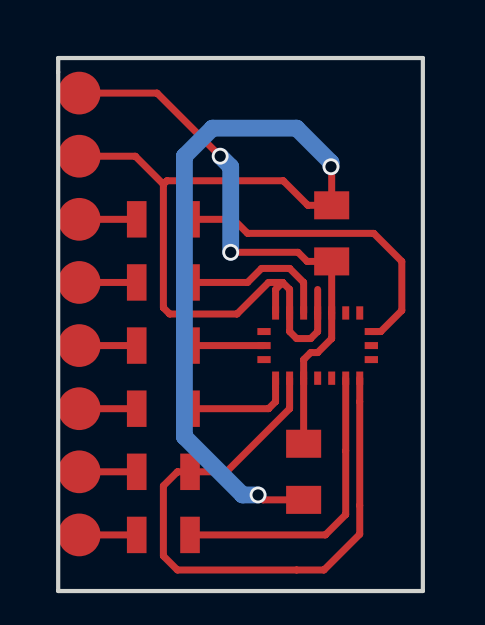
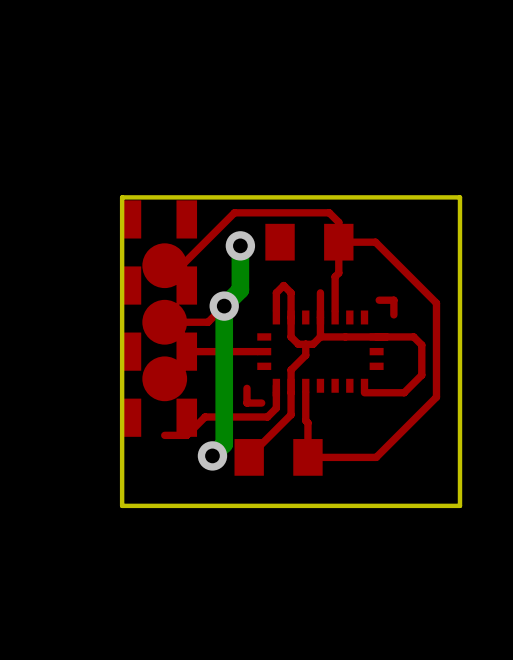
board edge: (422, 58) (58, 58) (58, 591) (422, 591) (422, 58) -> none
top track: (79, 93) (157, 93) (220, 156) -> none
part: (79, 93) -> none
top track: (79, 156) (135, 156) (163, 184) -> none
part: (79, 156) -> none
bottom track: (220, 156) (230, 166) (230, 252) -> none
via: (220, 156) -> none
bottom track: (330, 166) (330, 162) (296, 128) (212, 128) (184, 156) (184, 436) (242, 494) (258, 494) -> none
top track: (330, 166) (331, 205) (307, 205) (283, 180) (166, 180) (163, 184) -> none
via: (330, 166) -> none
top track: (163, 184) (163, 307) (169, 314) (237, 314) (268, 282) (282, 282) -> none
board edge: none -> (459, 197) (459, 505) (122, 505) (122, 197) (459, 197)
part: (79, 219) -> none
top track: (136, 219) (79, 219) -> none
top track: (190, 219) (233, 219) (247, 233) (373, 233) (401, 261) (401, 310) (380, 331) -> (364, 392) (404, 392) (421, 375) (421, 345) (413, 336) (386, 336)
part rotation: 0° (331, 233) -> 90° clockwise (309, 242)
via size: [222, 243, 240, 261] -> [225, 231, 256, 261]
bottom track: none -> (240, 245) (240, 289) (224, 306) (224, 444) (212, 455)
top track: (230, 252) (298, 252) (307, 261) (331, 261) (331, 274) -> (181, 265) (234, 212) (329, 212) (338, 222) (338, 273) (335, 276)
part: none -> (164, 265)
part: (79, 282) -> none
top track: (136, 282) (79, 282) -> none
top track: (190, 282) (247, 282) (261, 268) (289, 268) (303, 282) (303, 312) -> none
top track: none -> (379, 300) (393, 300) (393, 314)
top track: none -> (224, 306) (208, 322) (164, 322)
via: none -> (224, 306)
top track: (331, 306) (331, 338) (317, 352) (310, 352) (303, 359) (303, 384) -> none
part: none -> (164, 322)
top track: none -> (376, 336) (320, 336)
top track: none -> (305, 344) (305, 355) (291, 369) (291, 385)
part: (79, 345) -> none
top track: (136, 345) (79, 345) -> none
part: none -> (164, 378)
top track: (345, 378) (345, 514) (325, 534) (190, 534) -> none
top track: (359, 378) (359, 534) (323, 569) (177, 569) (163, 555) (163, 485) (177, 471) (226, 471) (289, 408) (289, 405) -> (249, 457) (291, 414)
top track: none -> (246, 388) (246, 403) (261, 403)
top track: (275, 399) (268, 408) (190, 408) -> (276, 408) (267, 416) (205, 416) (186, 435) (164, 435)
part: (79, 408) -> none
top track: (136, 408) (79, 408) -> none
top track: (303, 411) (303, 443) -> (305, 420) (307, 422) (307, 457) (376, 457) (436, 397) (436, 303) (375, 242) (338, 242)
via: none -> (212, 455)
part: (79, 471) -> none
top track: (136, 471) (79, 471) -> none
part: (163, 471) -> none
part rotation: 0° (303, 471) -> 90° clockwise (278, 457)
top track: (258, 494) (262, 499) (303, 499) -> none
via: (258, 494) -> none
part: (79, 534) -> none
top track: (136, 534) (79, 534) -> none
part: (163, 534) -> none

